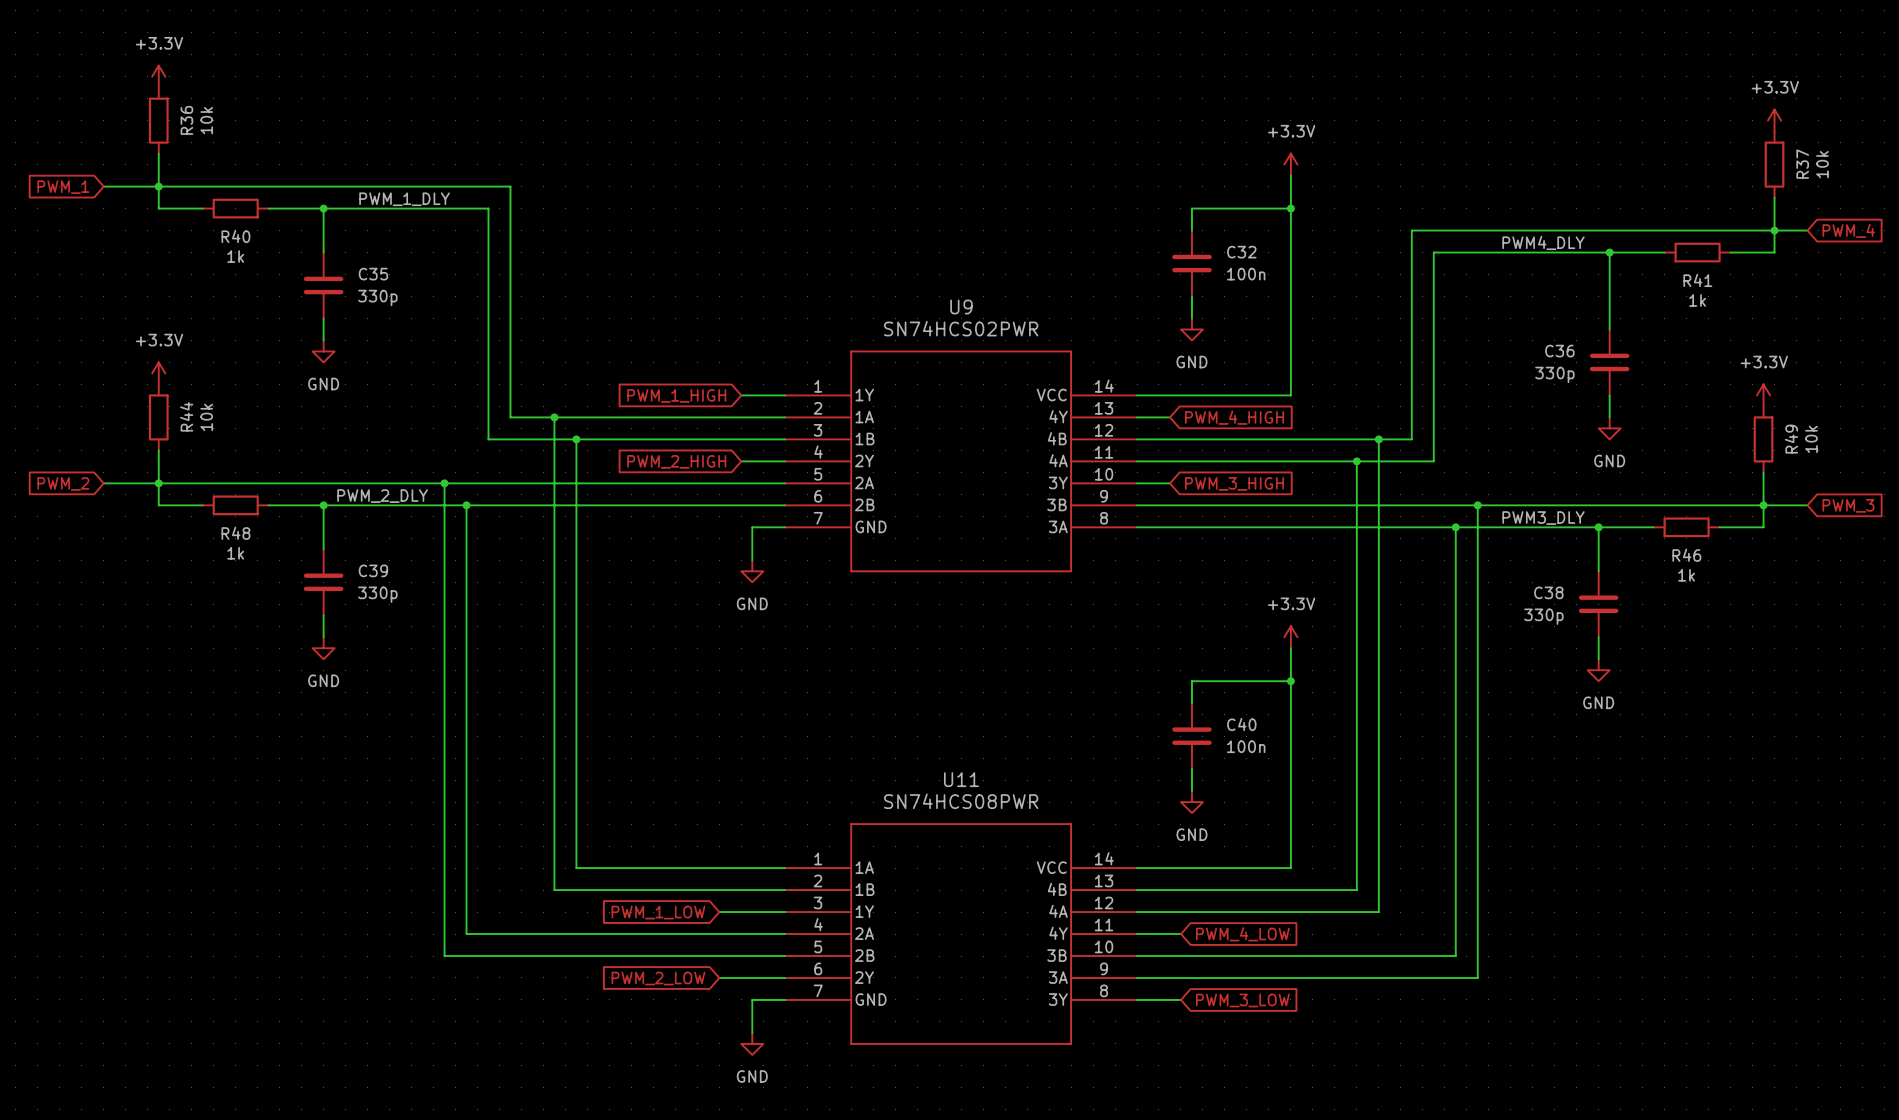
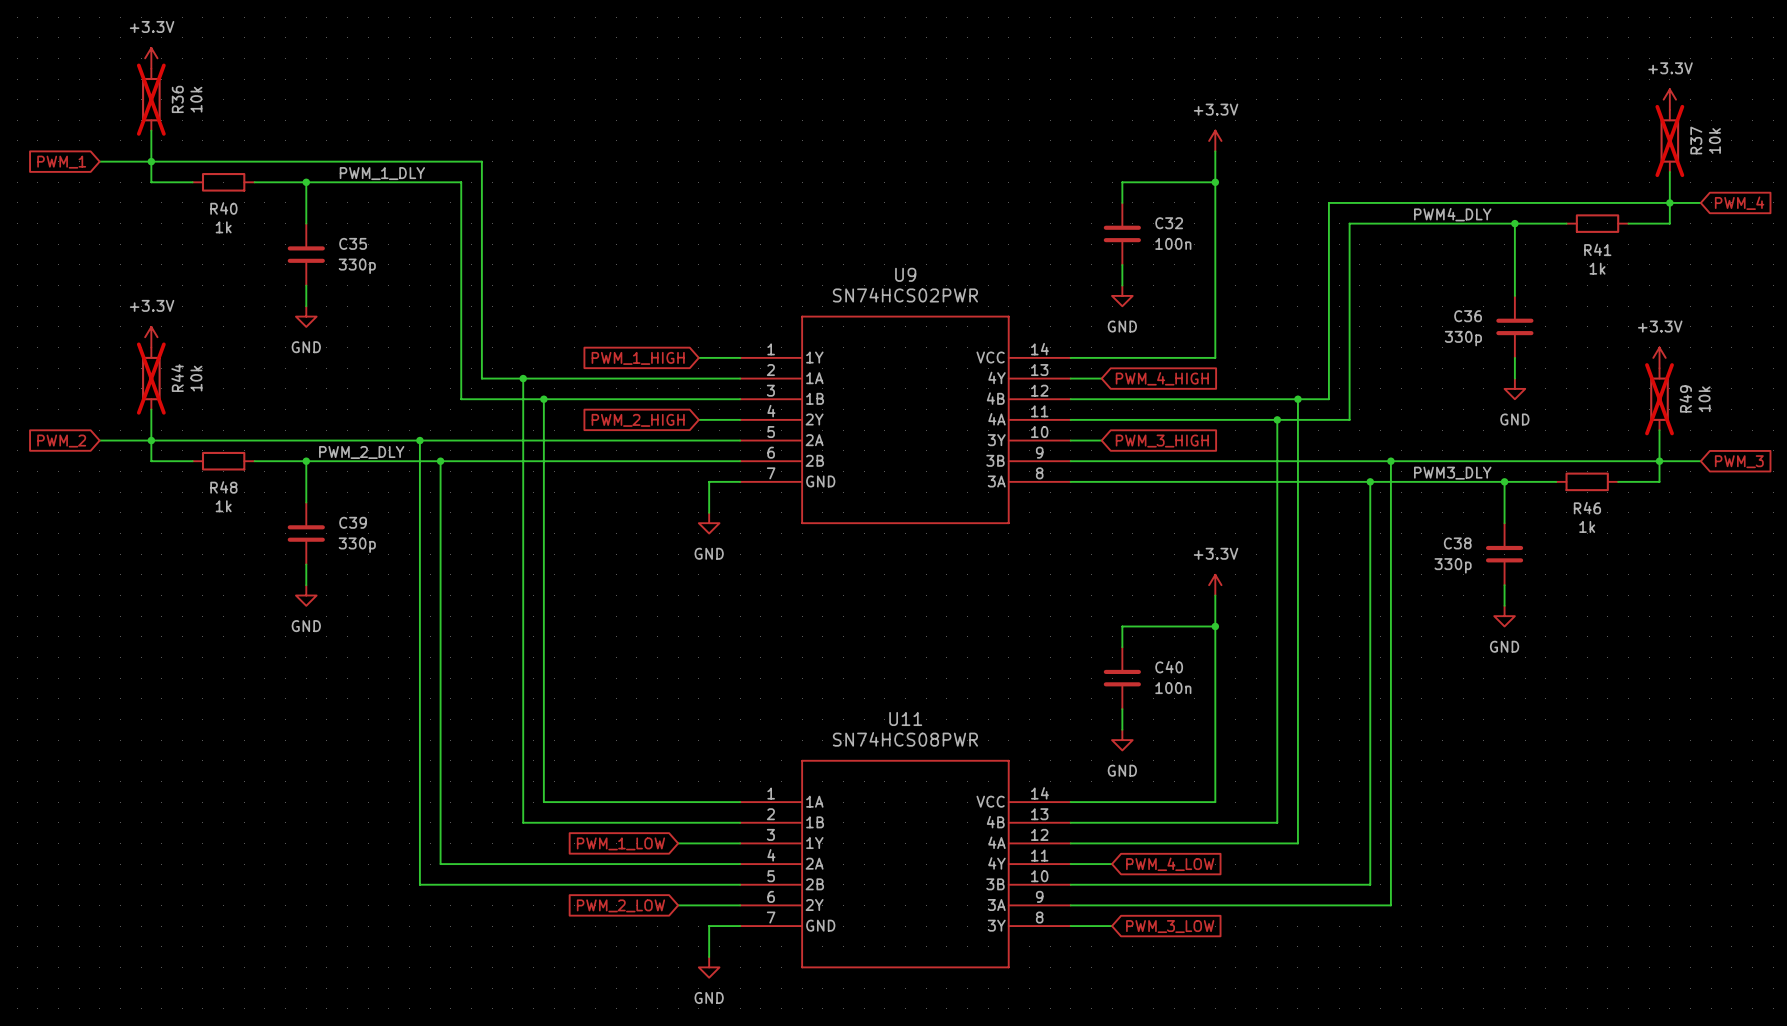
R36 do-not-place cross: none -> (151, 99)
R37 do-not-place cross: none -> (1669, 140)
R44 do-not-place cross: none -> (151, 378)
R49 do-not-place cross: none -> (1659, 399)

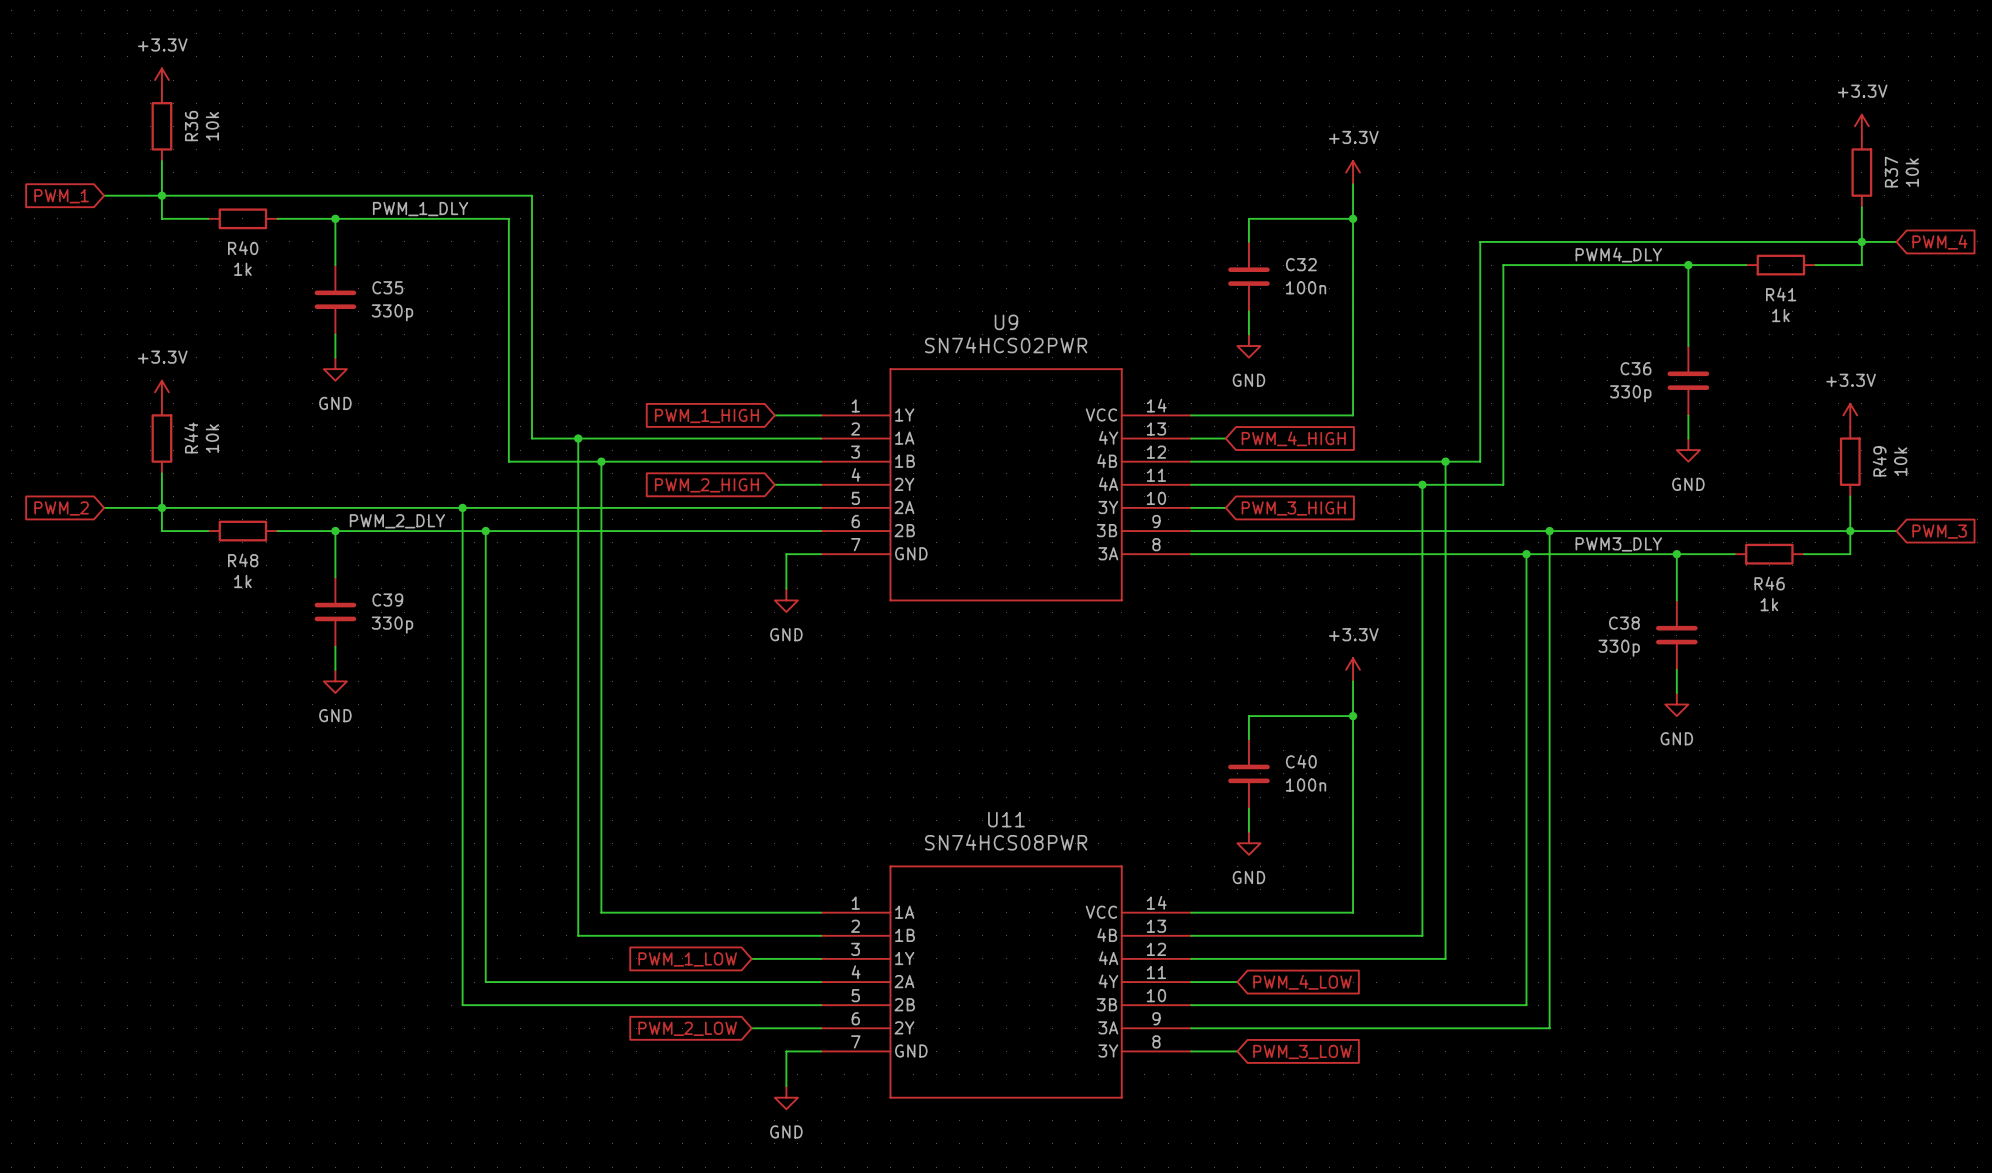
R36 do-not-place cross: (151, 99) -> none
R37 do-not-place cross: (1669, 140) -> none
R44 do-not-place cross: (151, 378) -> none
R49 do-not-place cross: (1659, 399) -> none

